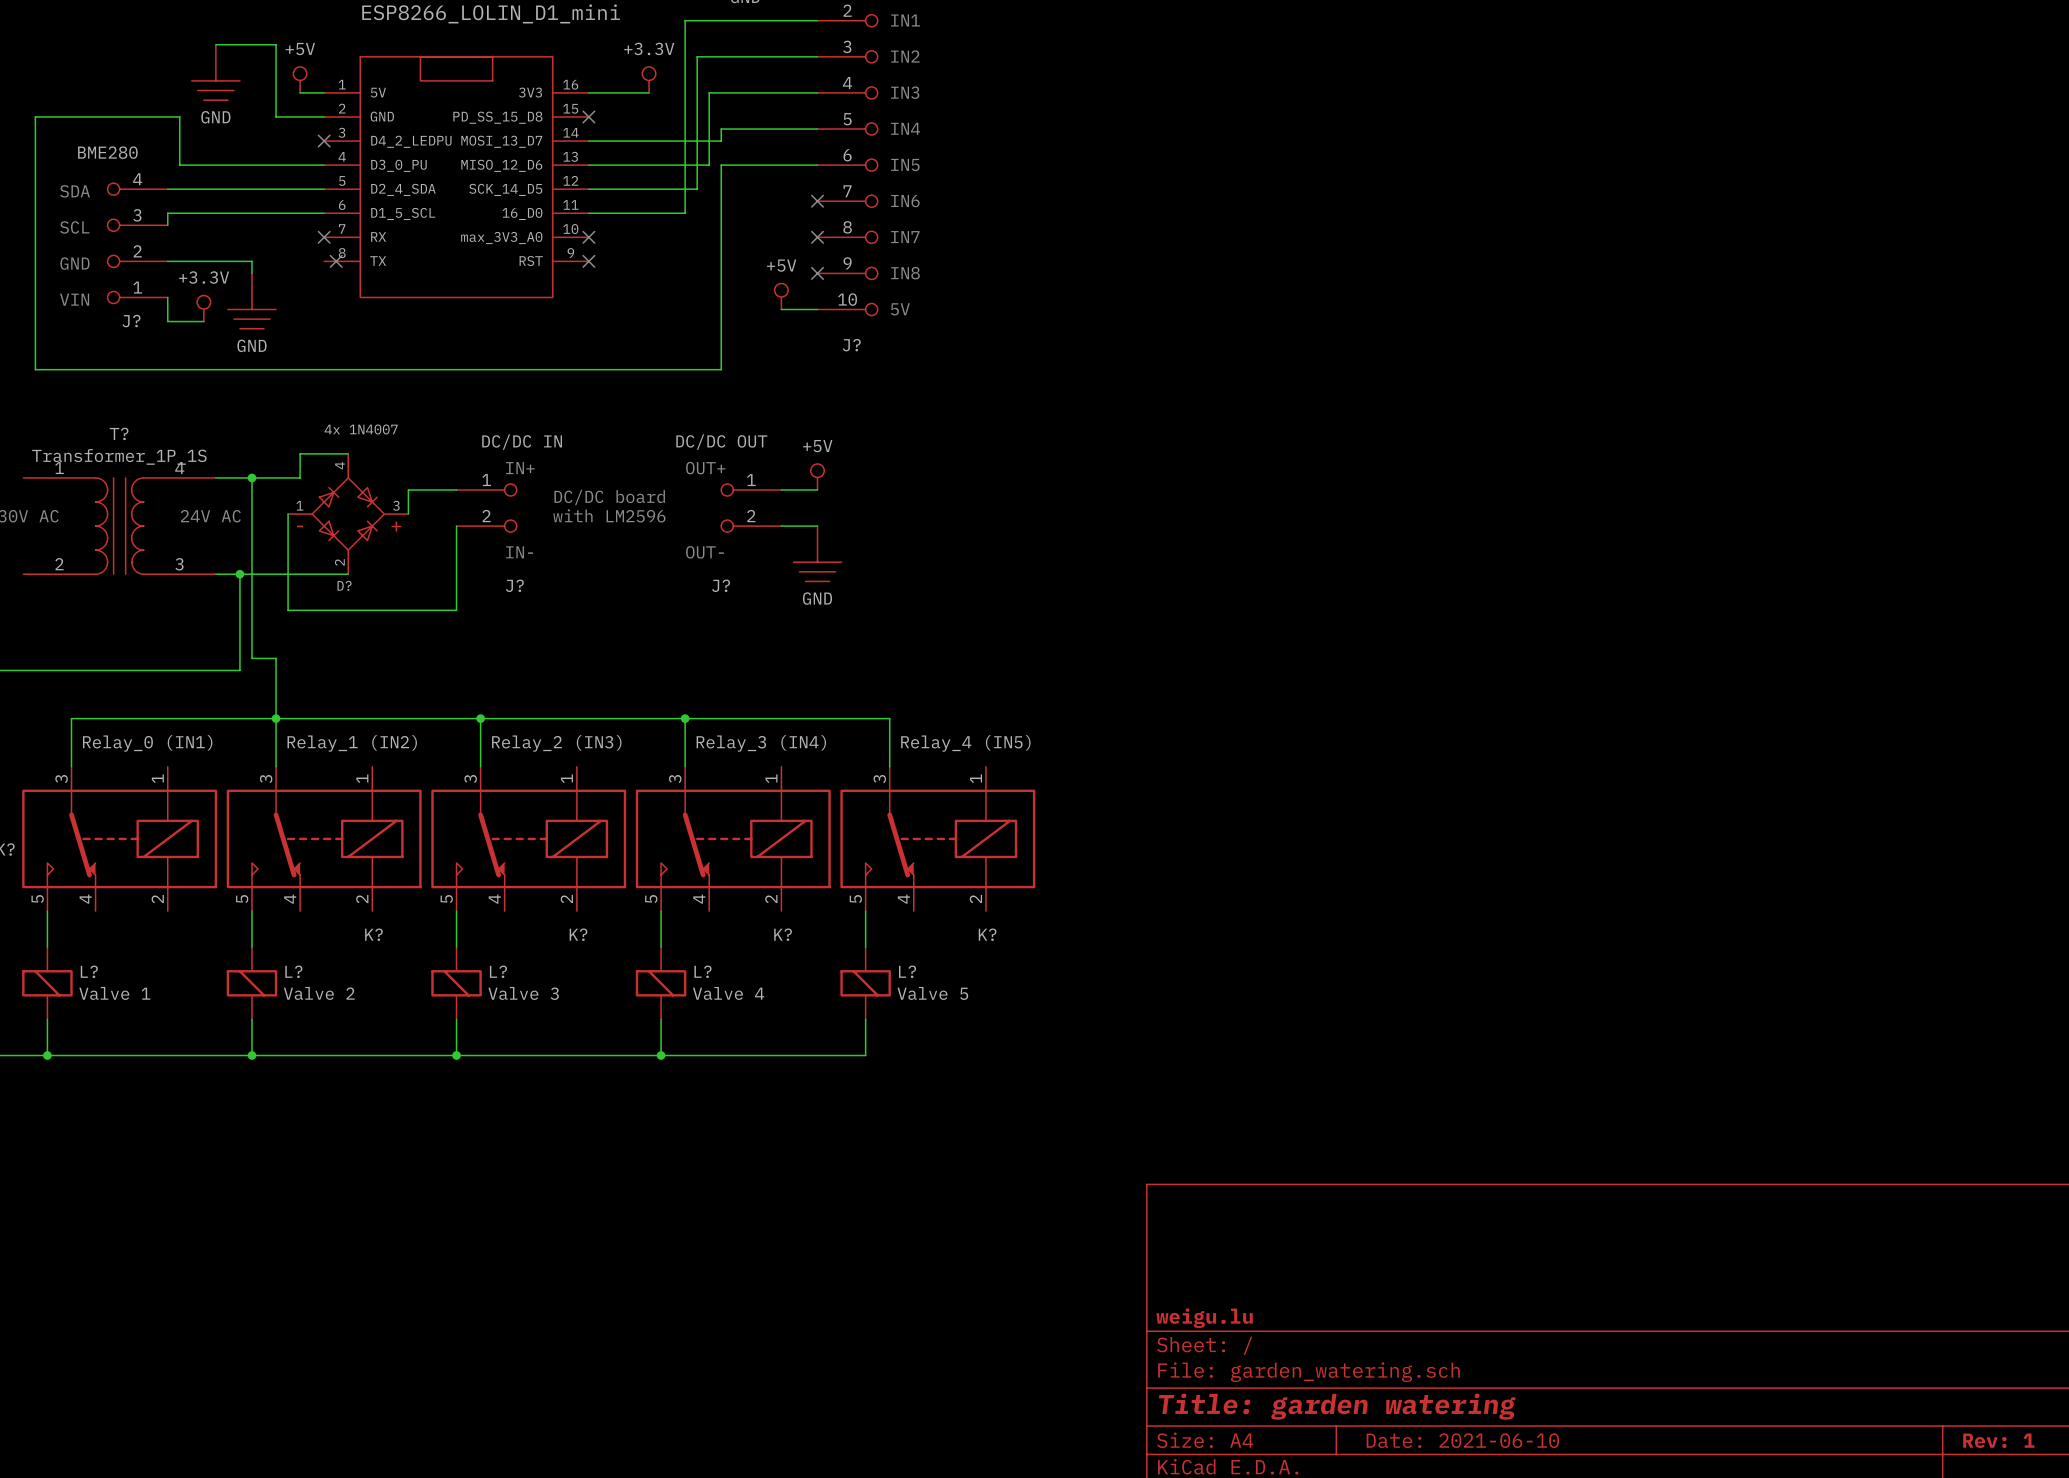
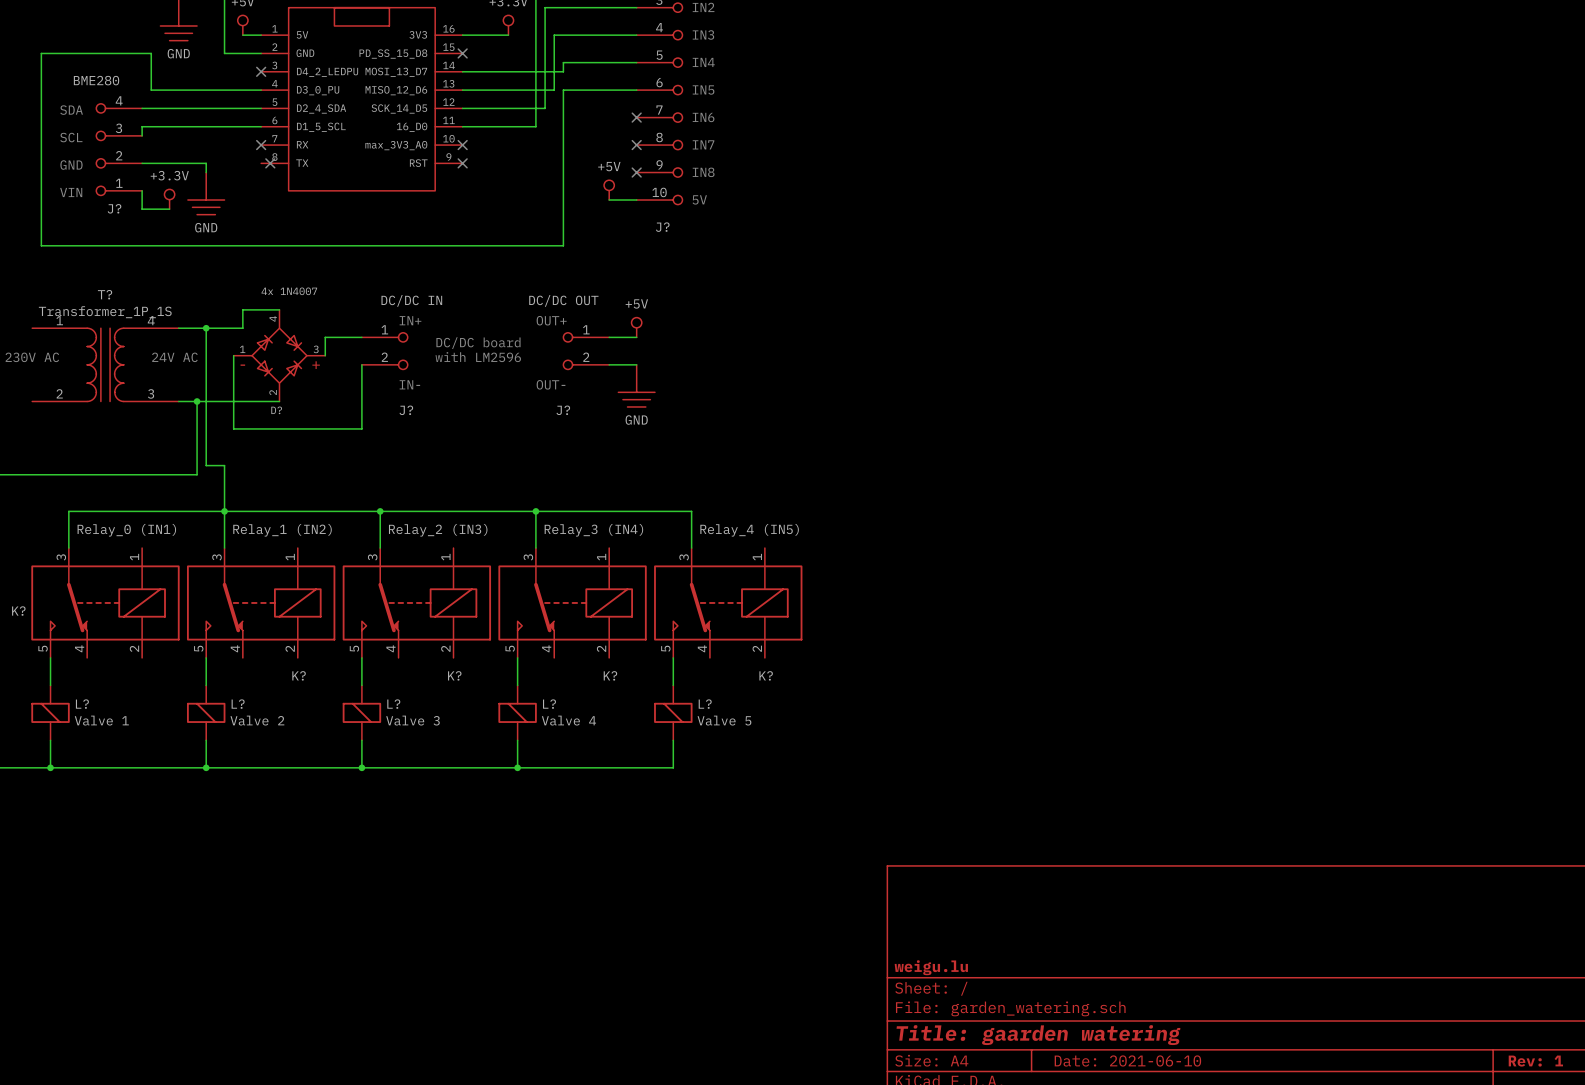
title block: Title: garden watering (1337, 1406) -> Title: gaarden watering (1038, 1035)

